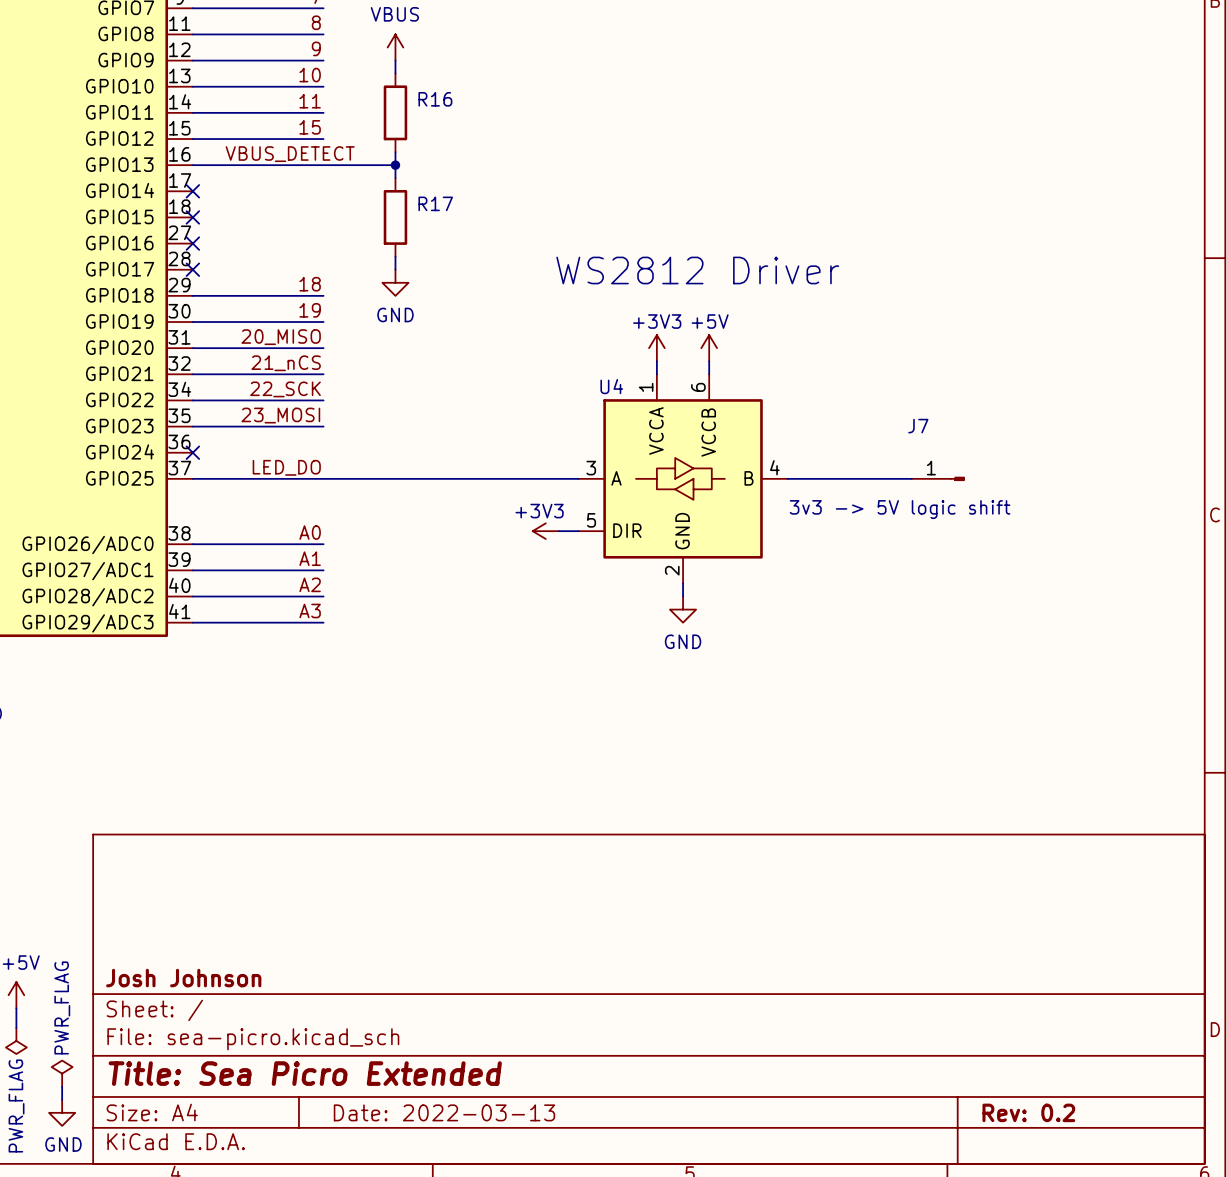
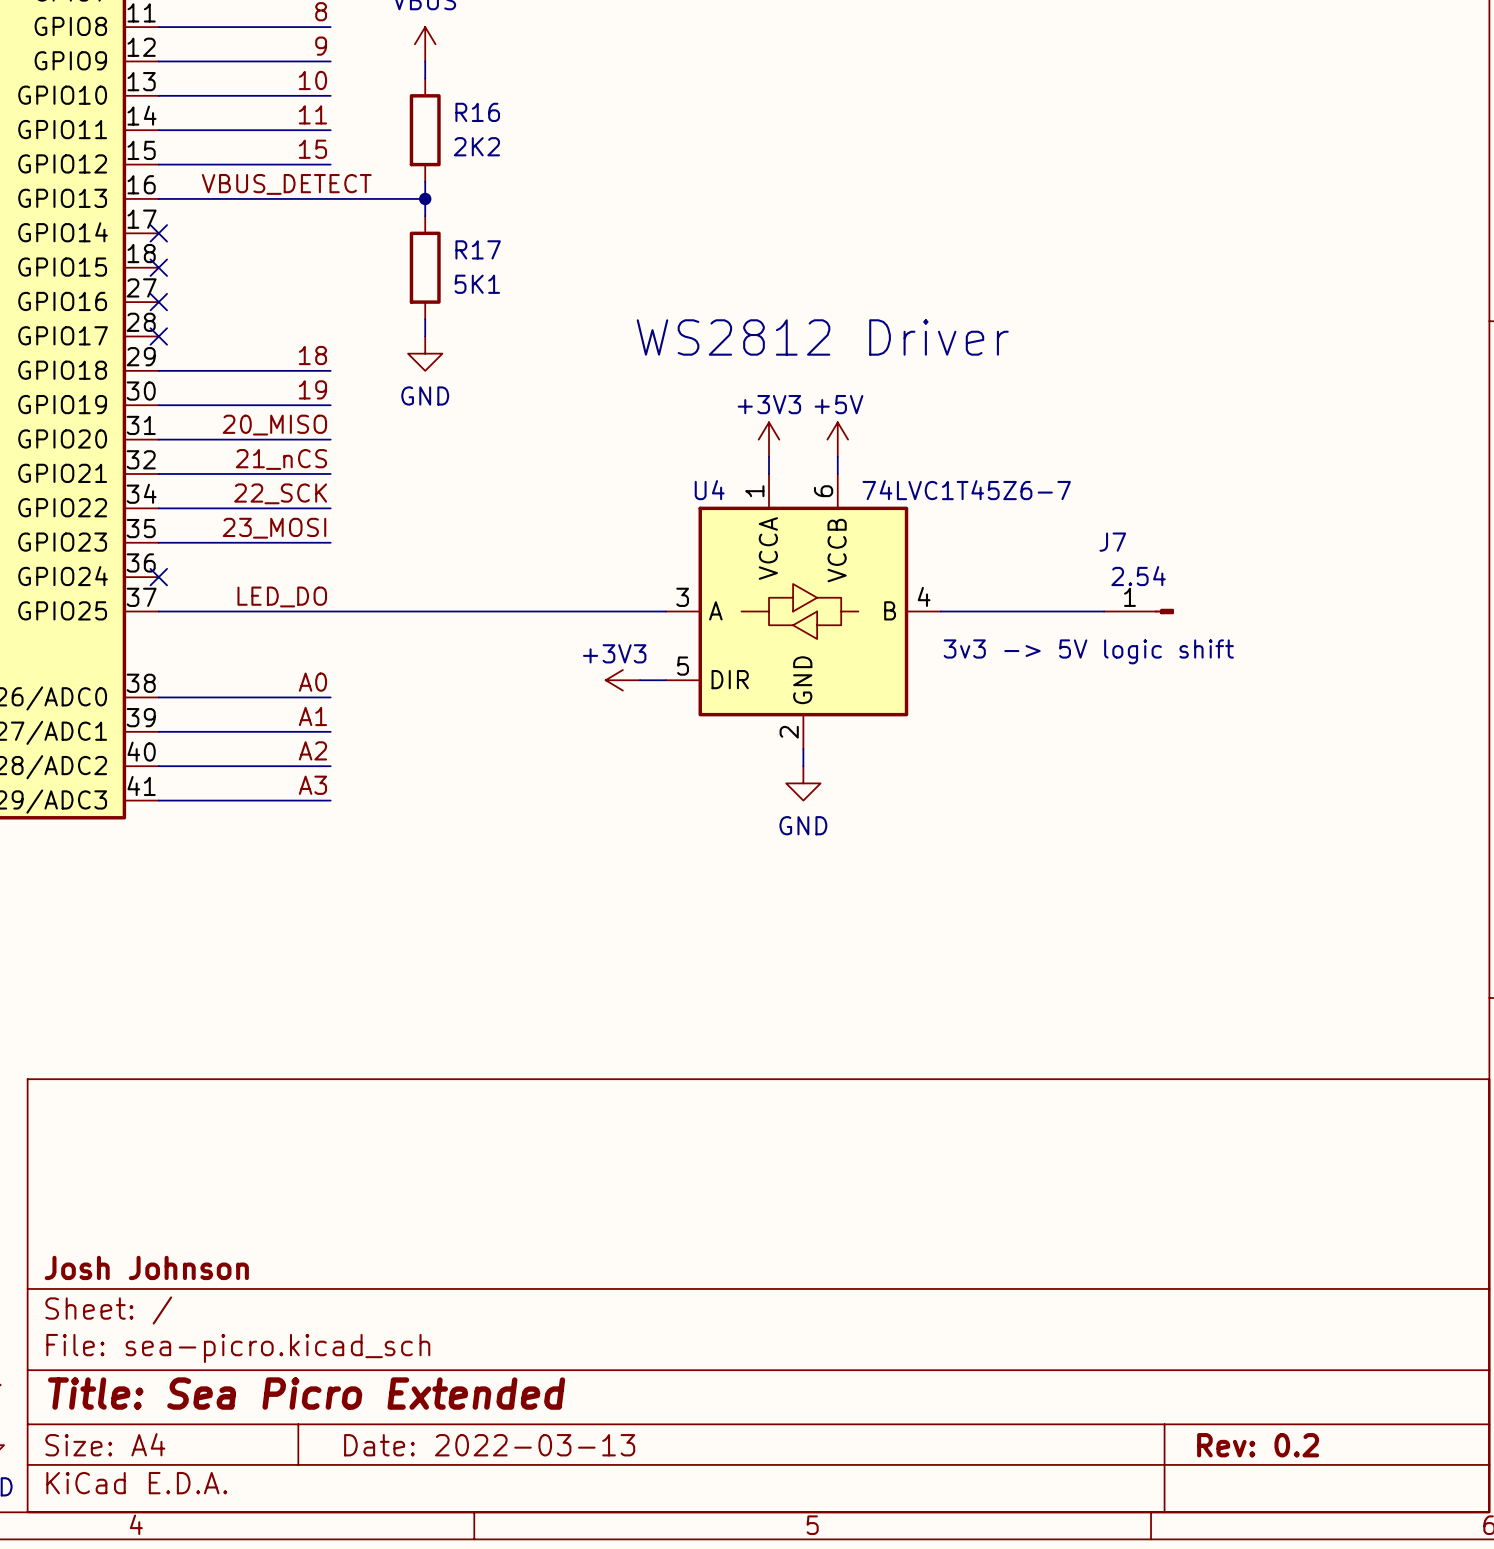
R16 value: none -> 2K2 (476, 146)
R17 value: none -> 5K1 (477, 284)
U4 value: none -> 74LVC1T45Z6-7 (966, 490)
J7 value: none -> 2.54 (1138, 576)

